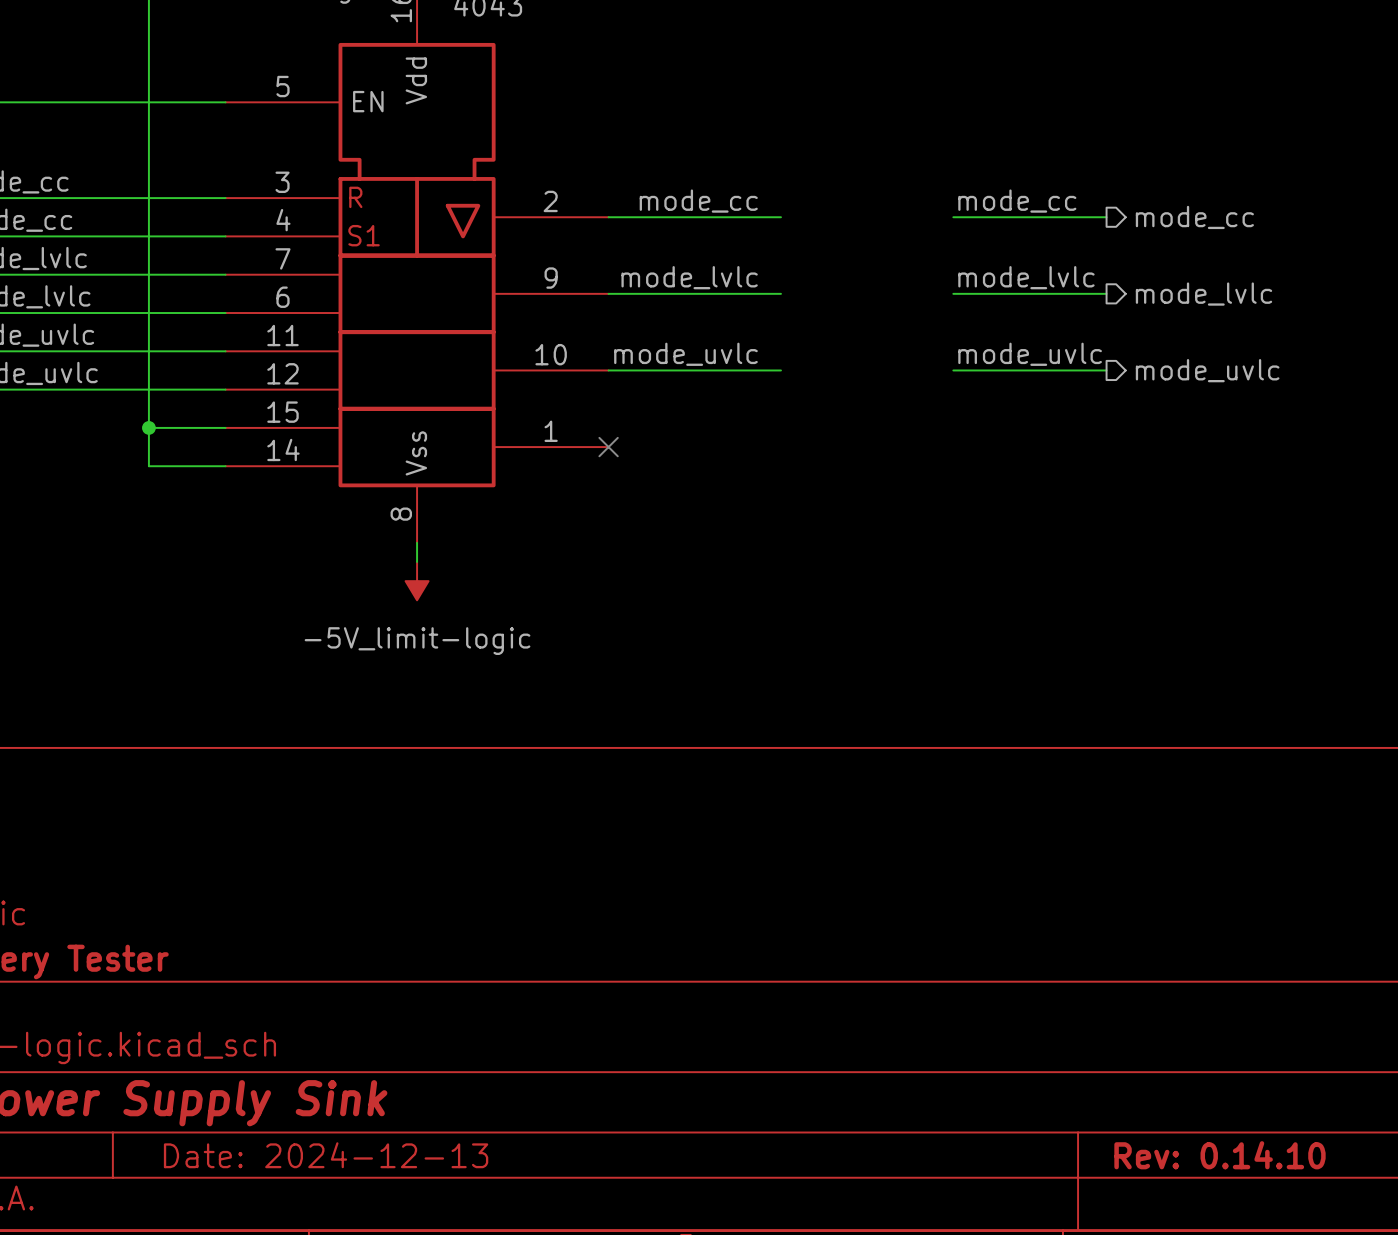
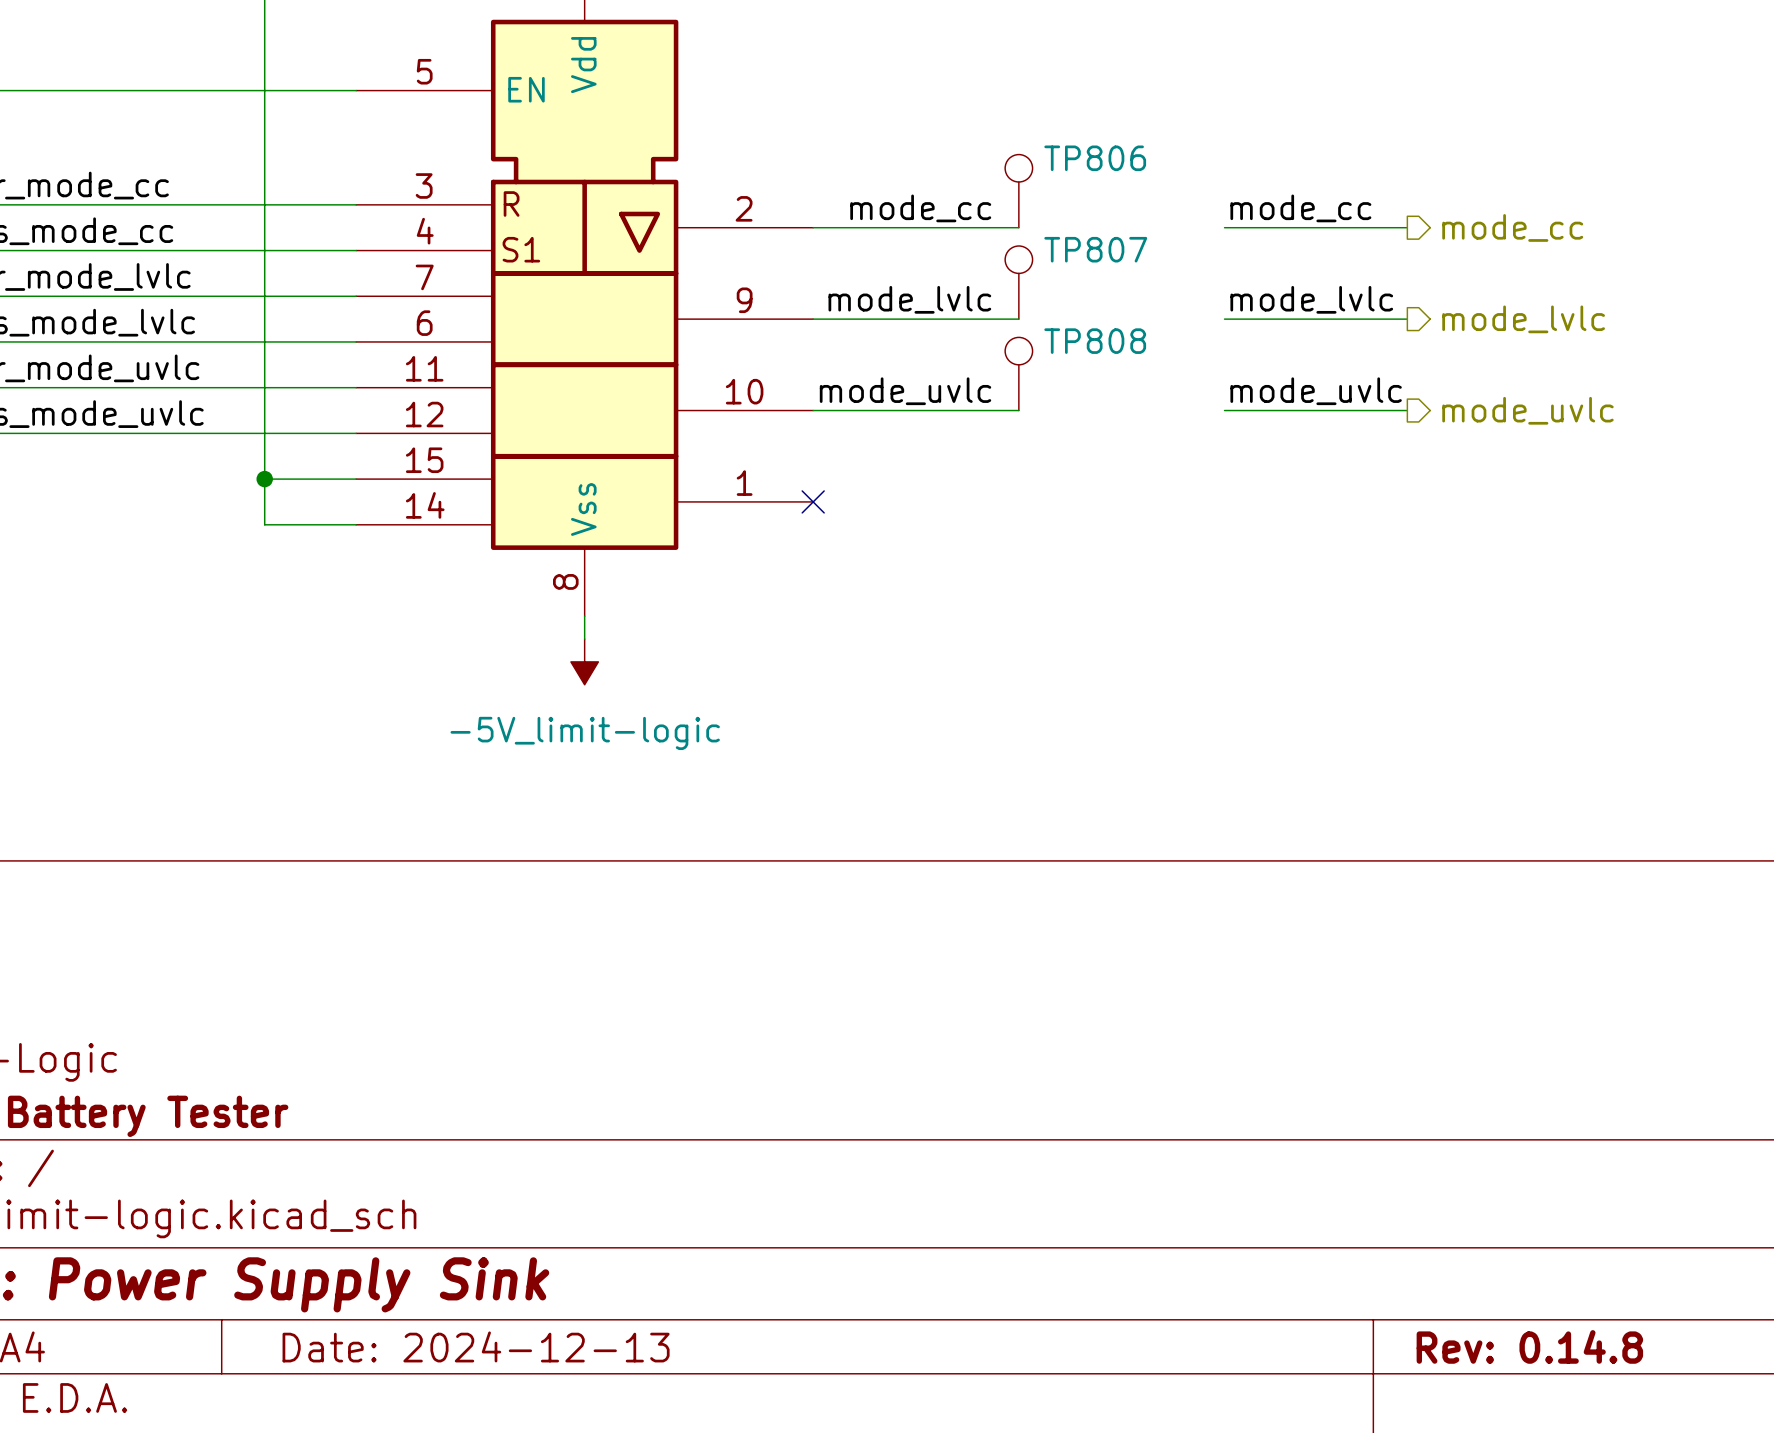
TP806: none -> (1018, 191)
TP807: none -> (1018, 282)
TP808: none -> (1018, 373)
title block: Rev: 0.14.10 (1219, 1155) -> Rev: 0.14.8 (1529, 1346)

